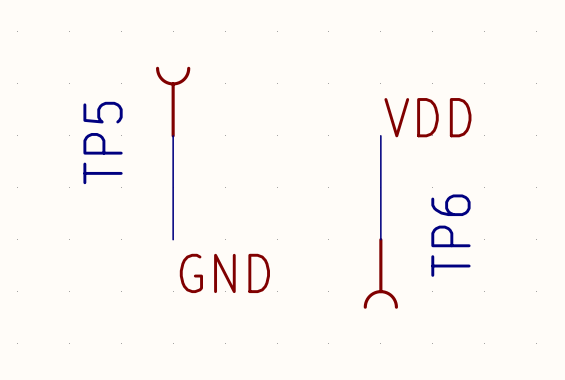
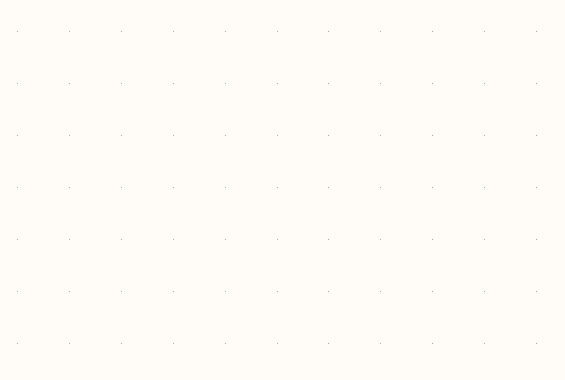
TP5: (173, 102) -> none
label: VDD (427, 117) -> none
wire: (173, 135) (173, 239) -> none
wire: (380, 135) (380, 239) -> none
label: GND (224, 273) -> none
TP6: (380, 273) -> none

